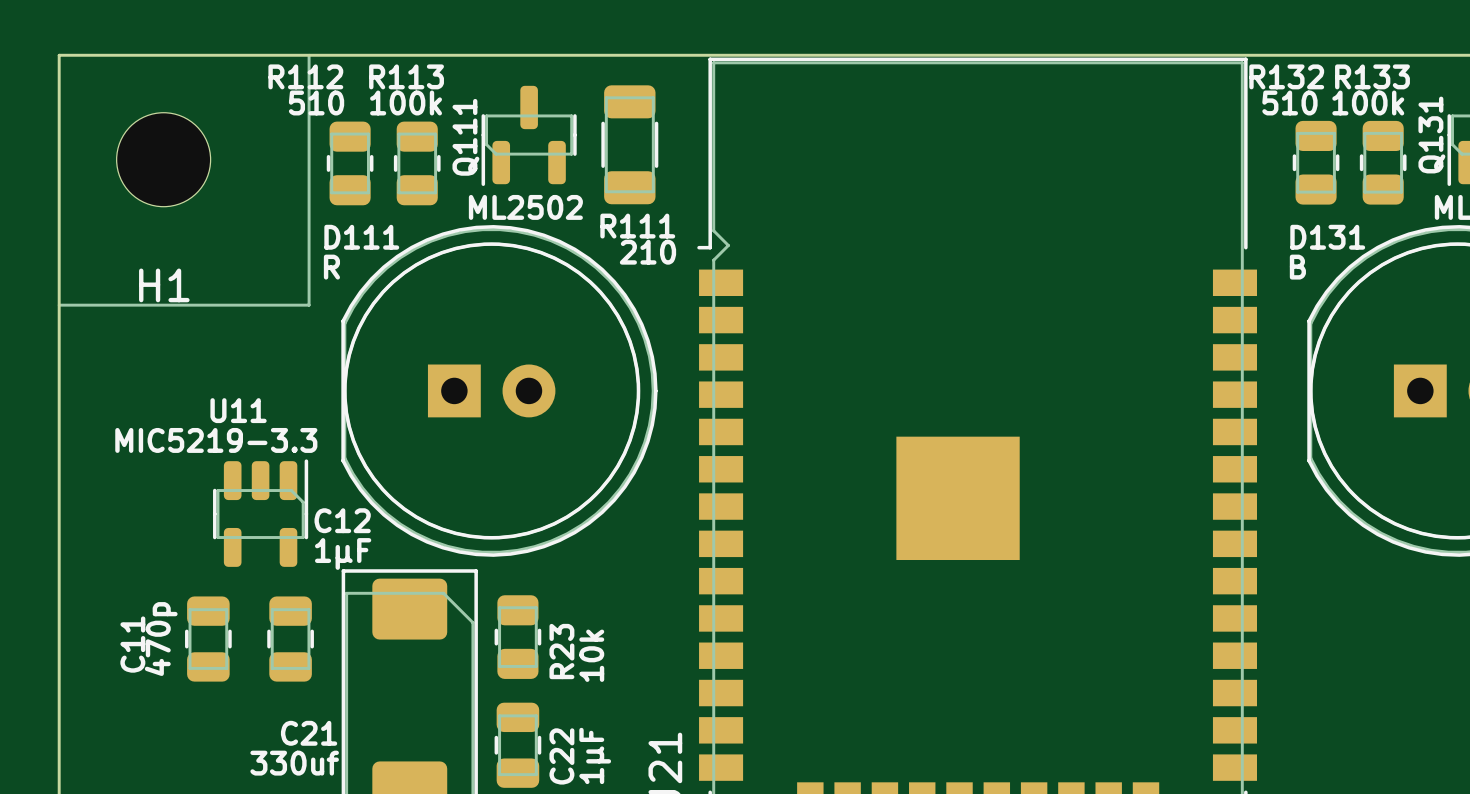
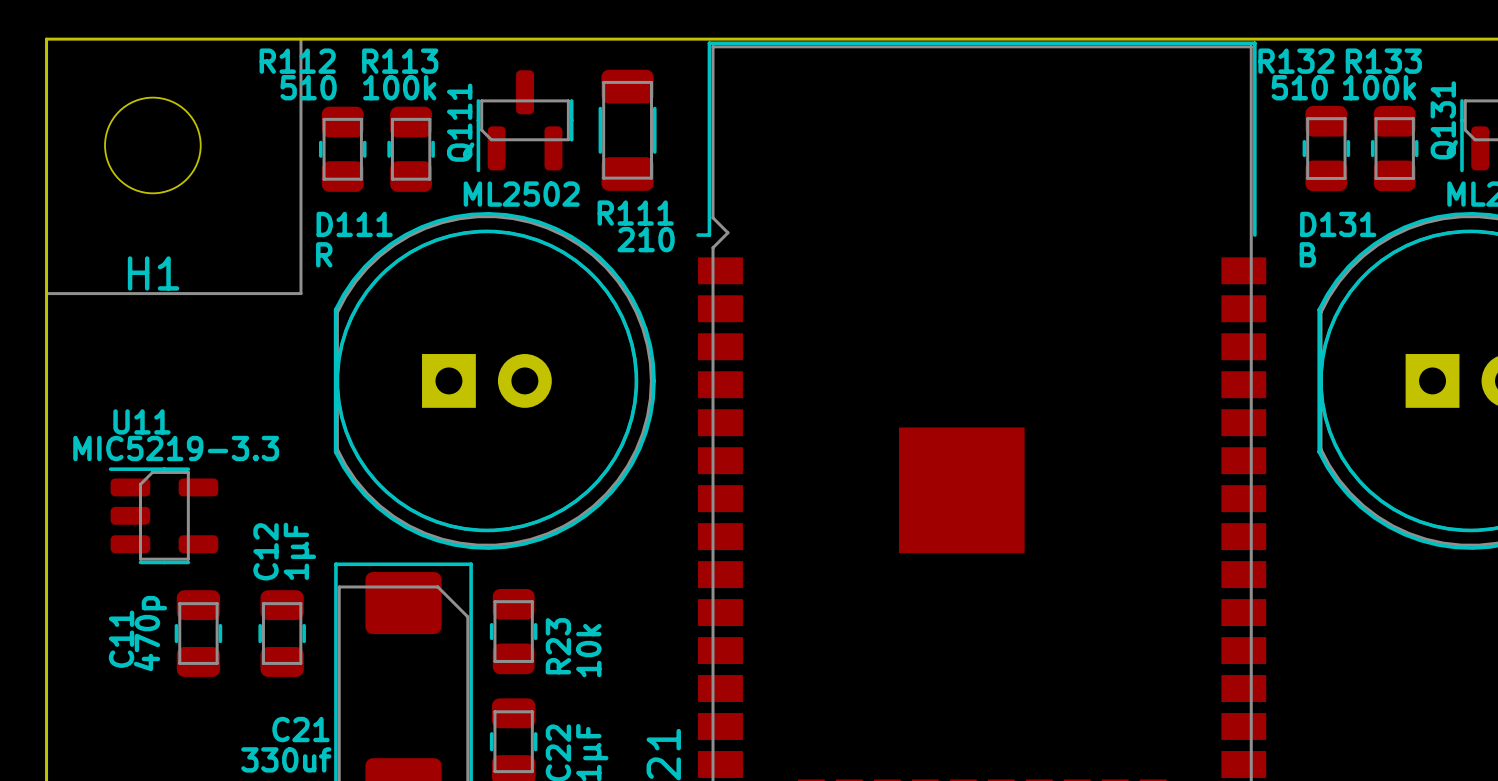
U11 rotation: 0° (260, 513) -> 90° counterclockwise (163, 515)
U11 position: (260, 513) -> (163, 515)
C12 name rotation: 0° (342, 520) -> 90° counterclockwise (266, 551)
C12 name position: C12 (342, 520) -> C12 (266, 551)
C12 value rotation: 0° (343, 553) -> 90° counterclockwise (299, 551)

